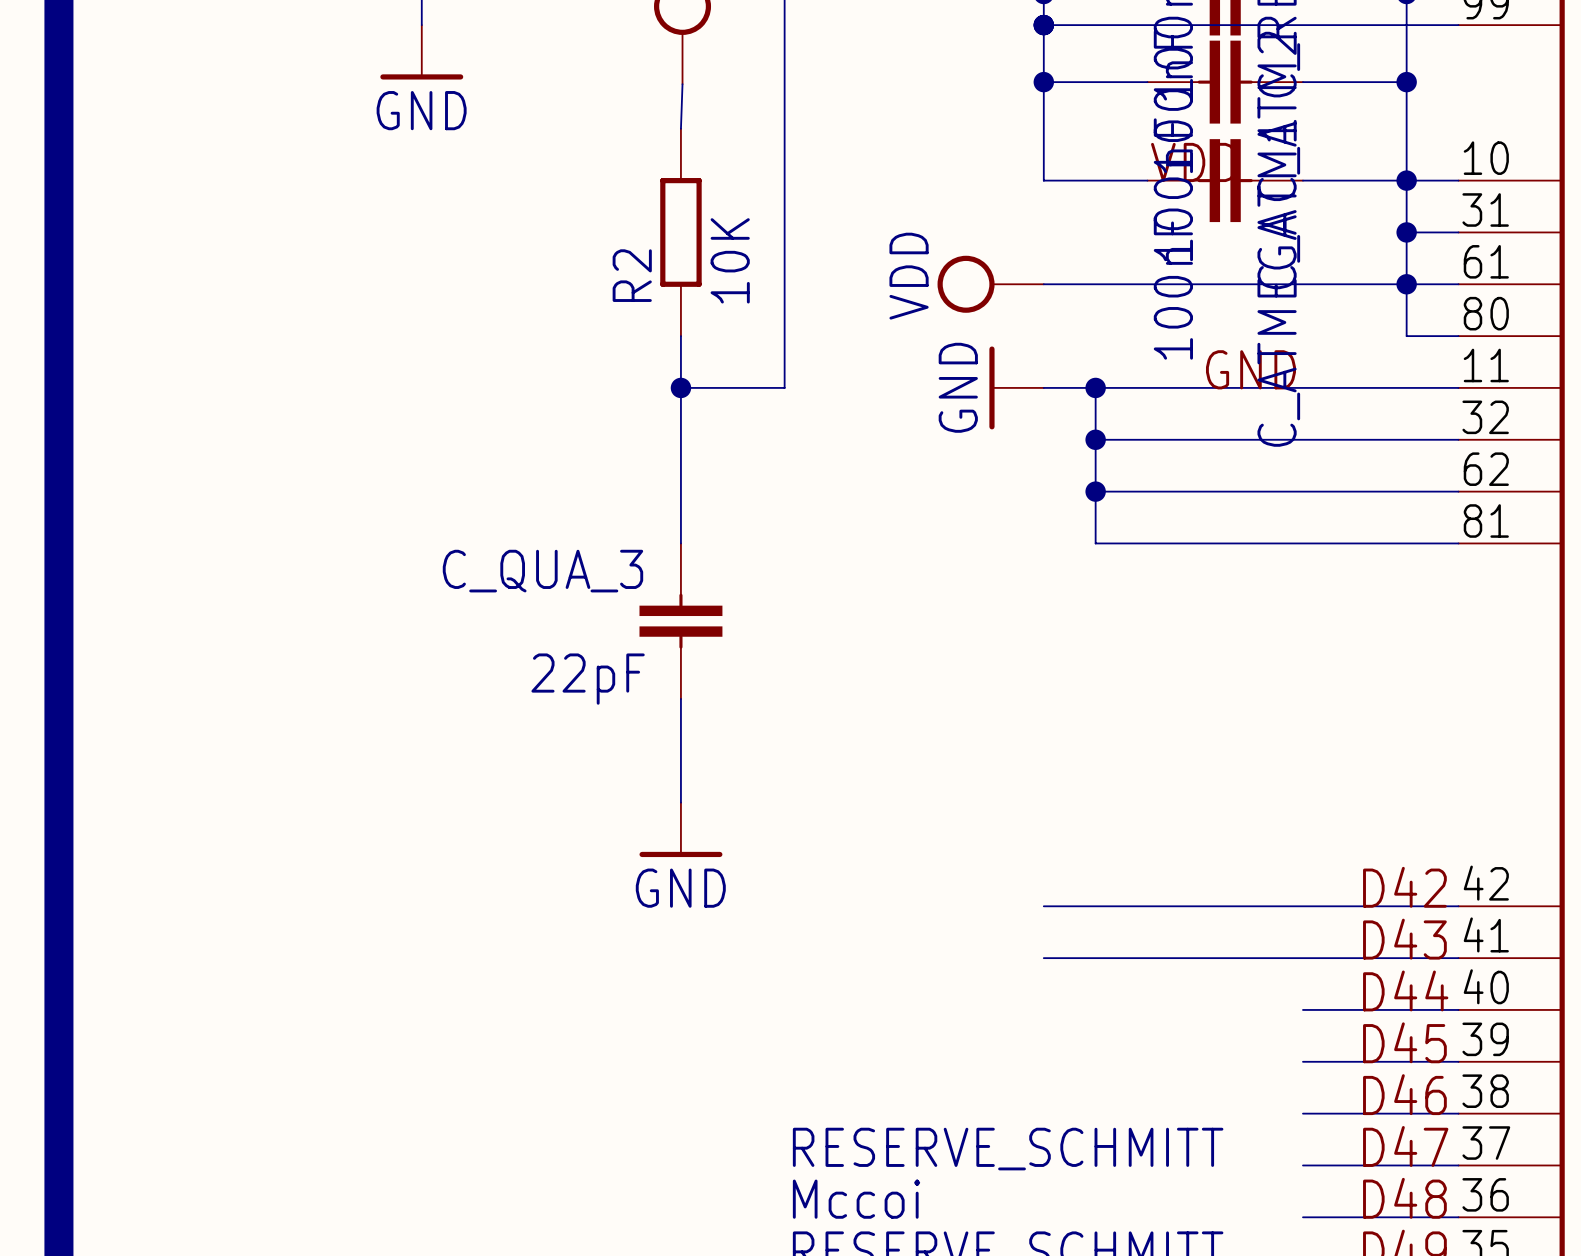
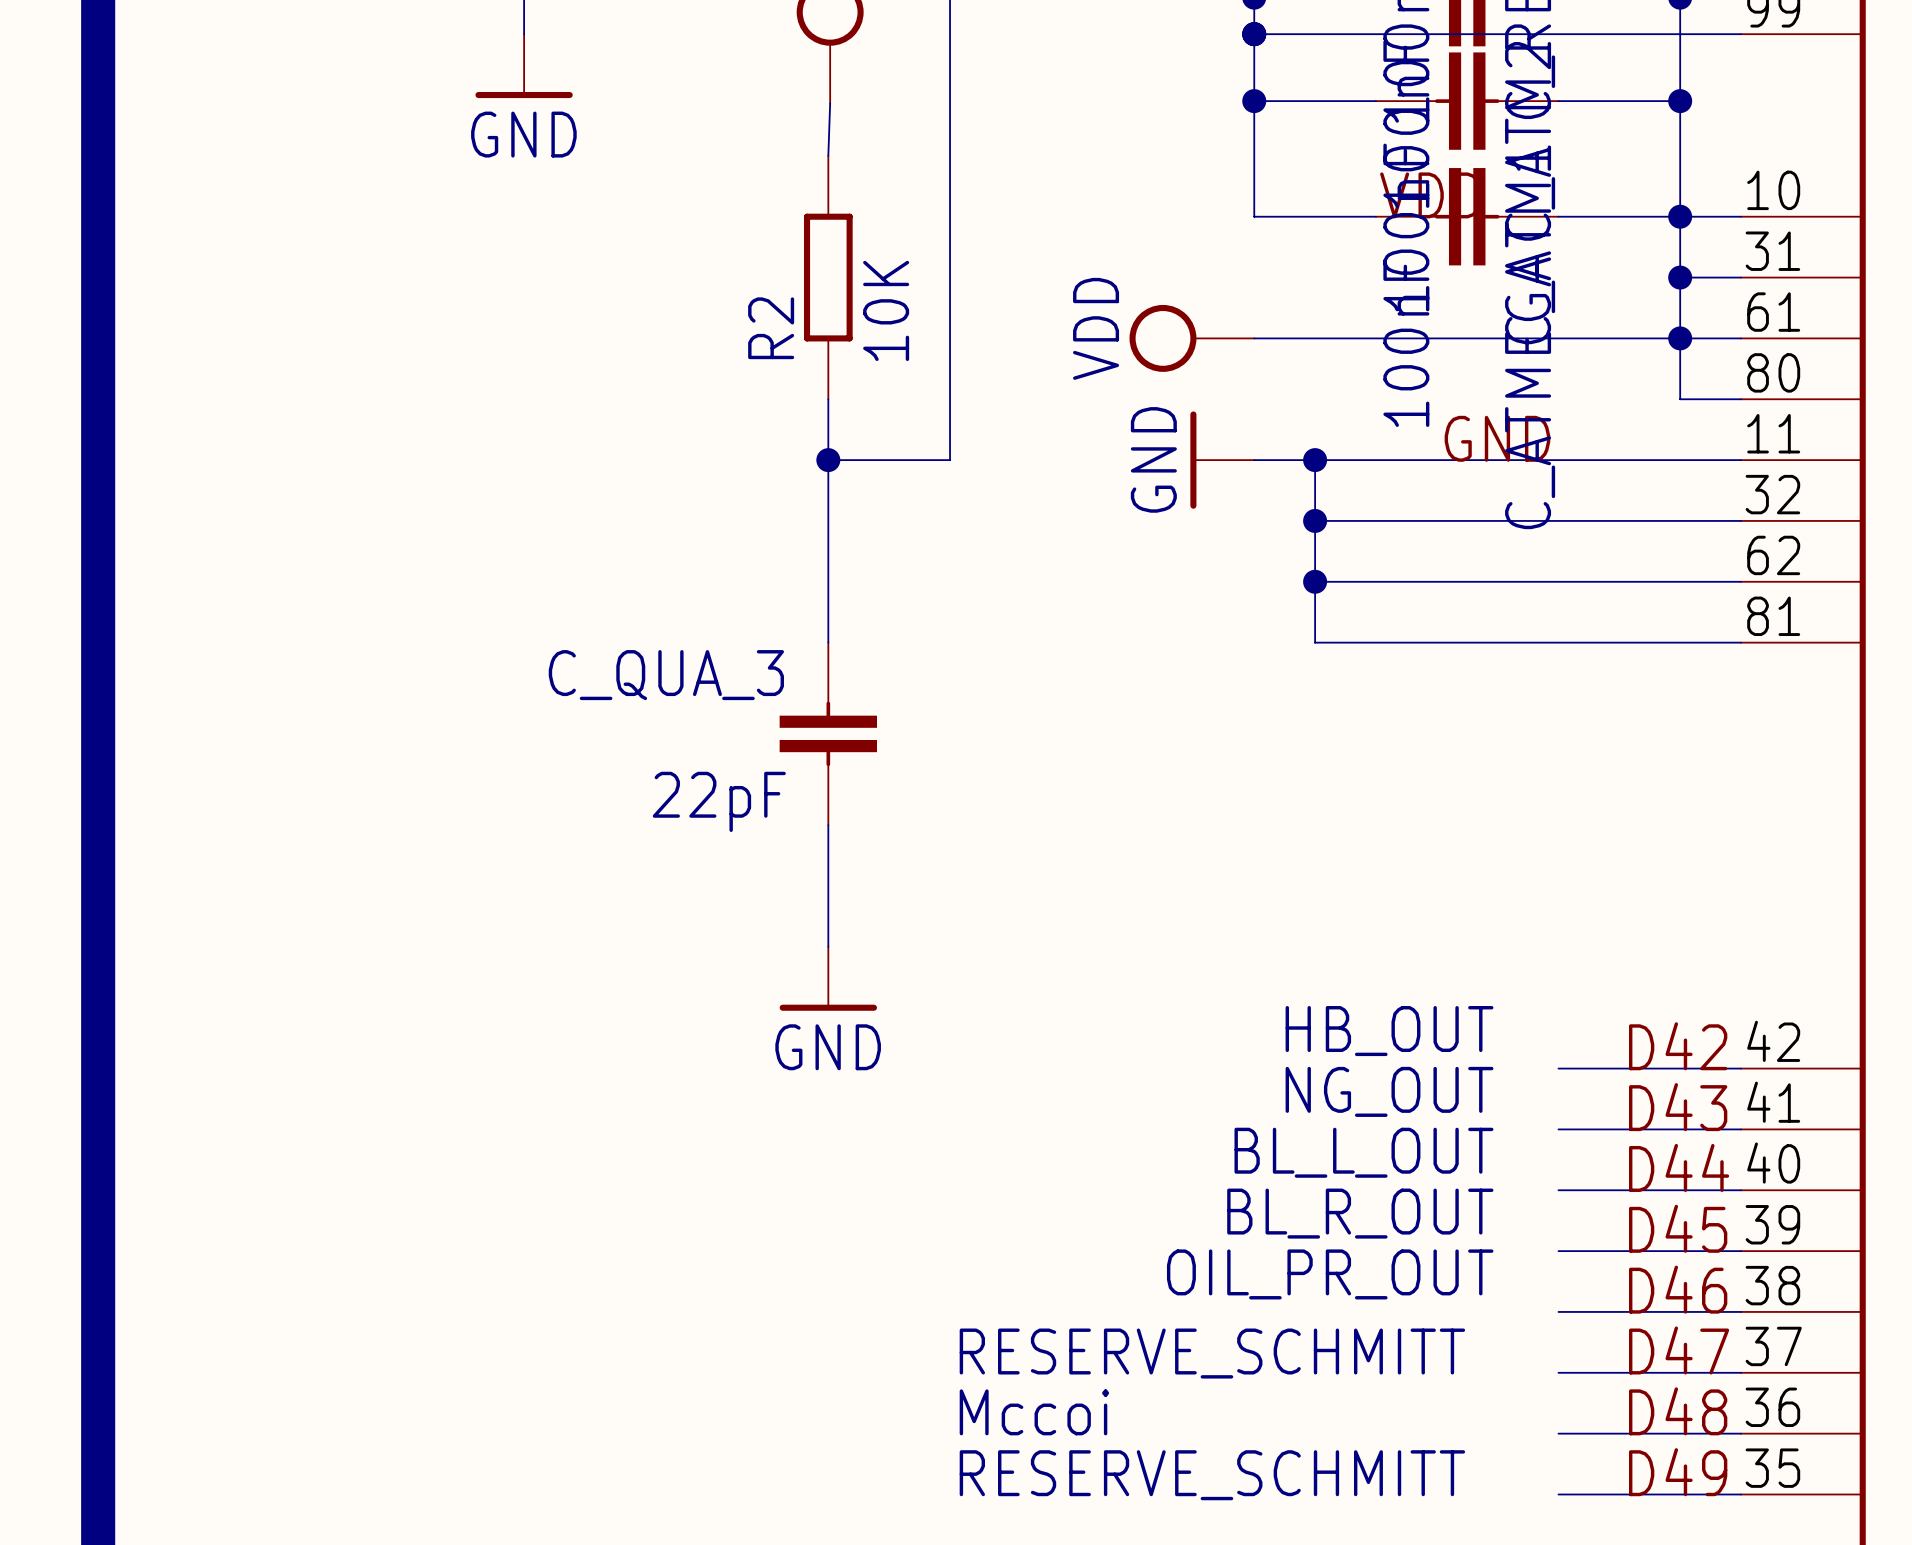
text: none -> HB_OUT (1389, 1031)
wire: (1043, 906) (1302, 906) -> none
text: none -> NG_OUT (1389, 1091)
wire: (1043, 958) (1302, 958) -> none
text: none -> BL_L_OUT (1363, 1152)
text: none -> BL_R_OUT (1360, 1213)
text: none -> OIL_PR_OUT (1330, 1274)

